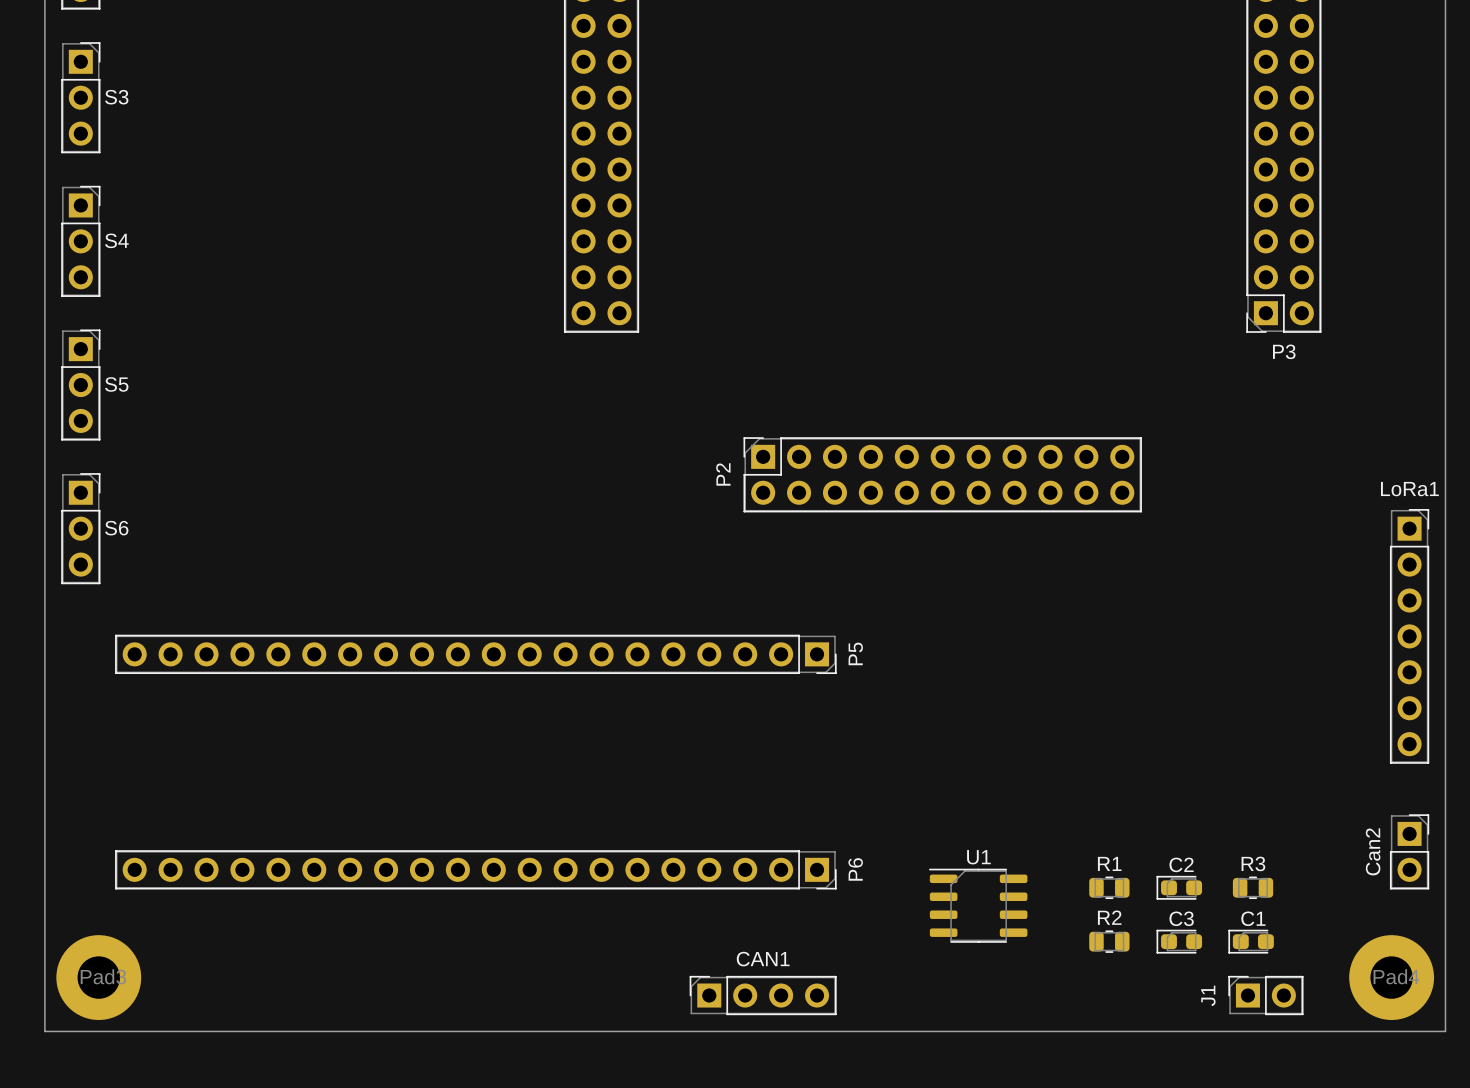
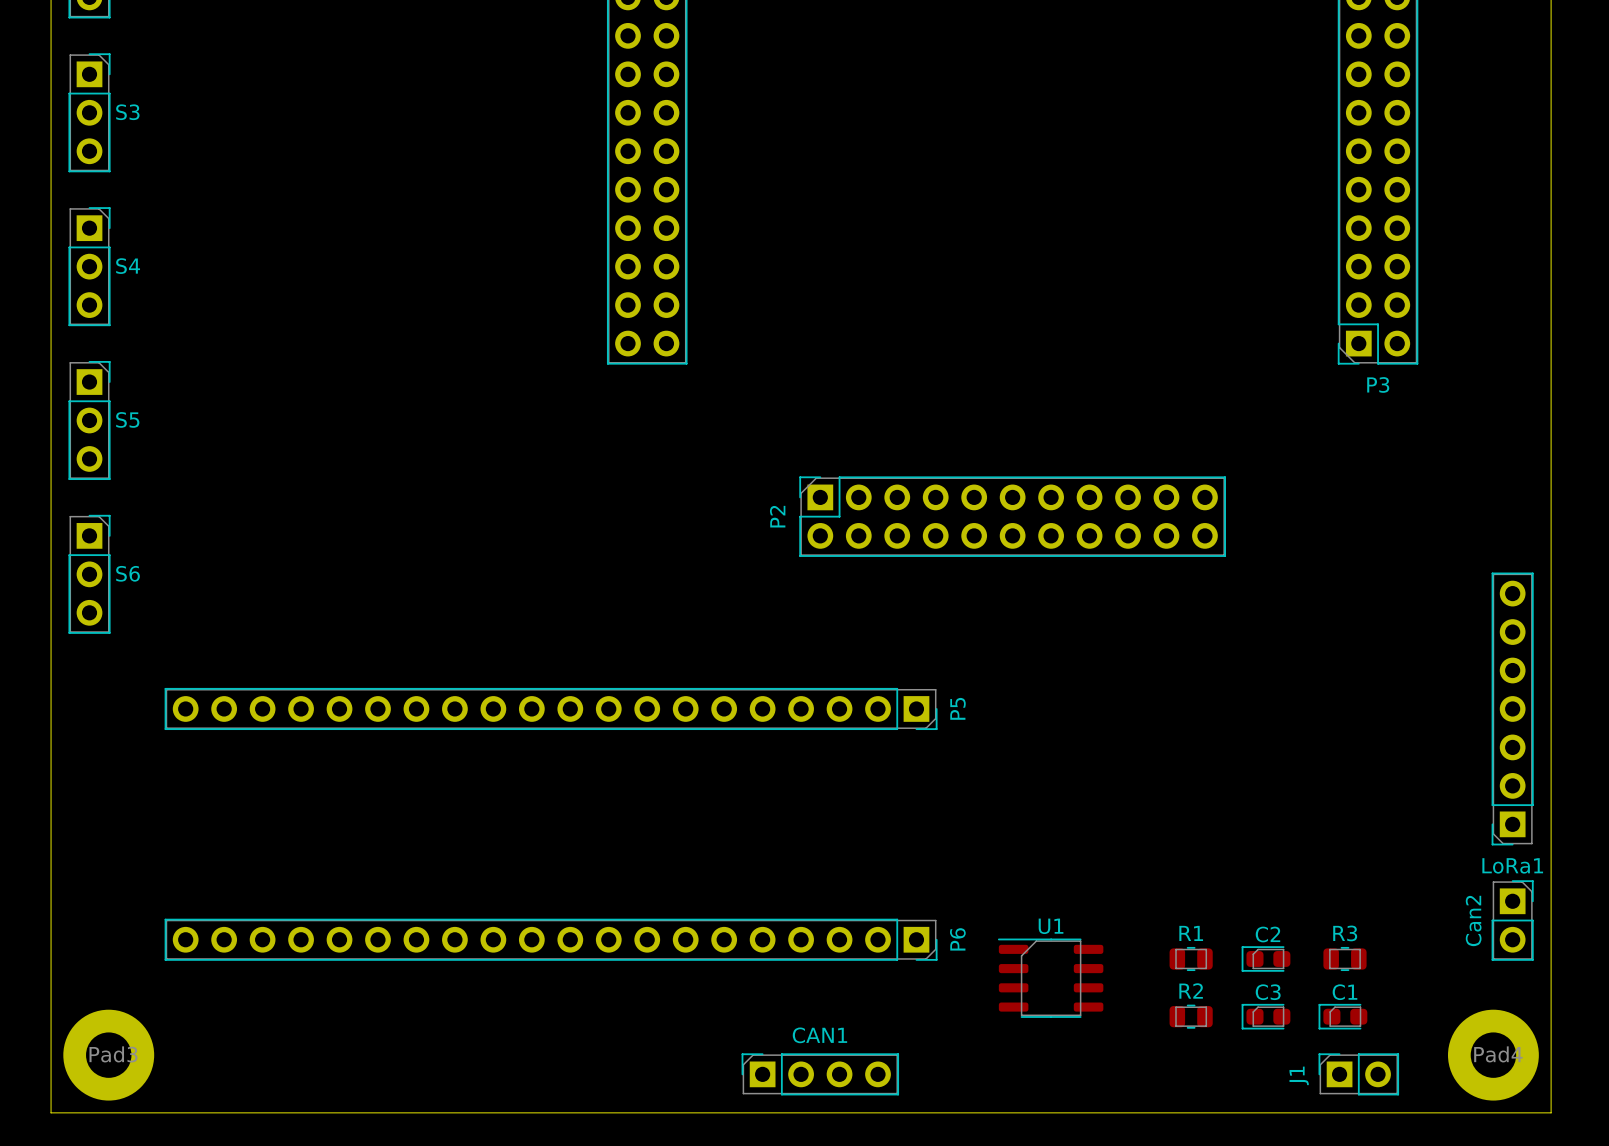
LoRa1 rotation: 0° (1409, 636) -> 180° (1512, 708)
P5 position: (475, 654) -> (551, 708)
P6 position: (475, 869) -> (551, 939)

